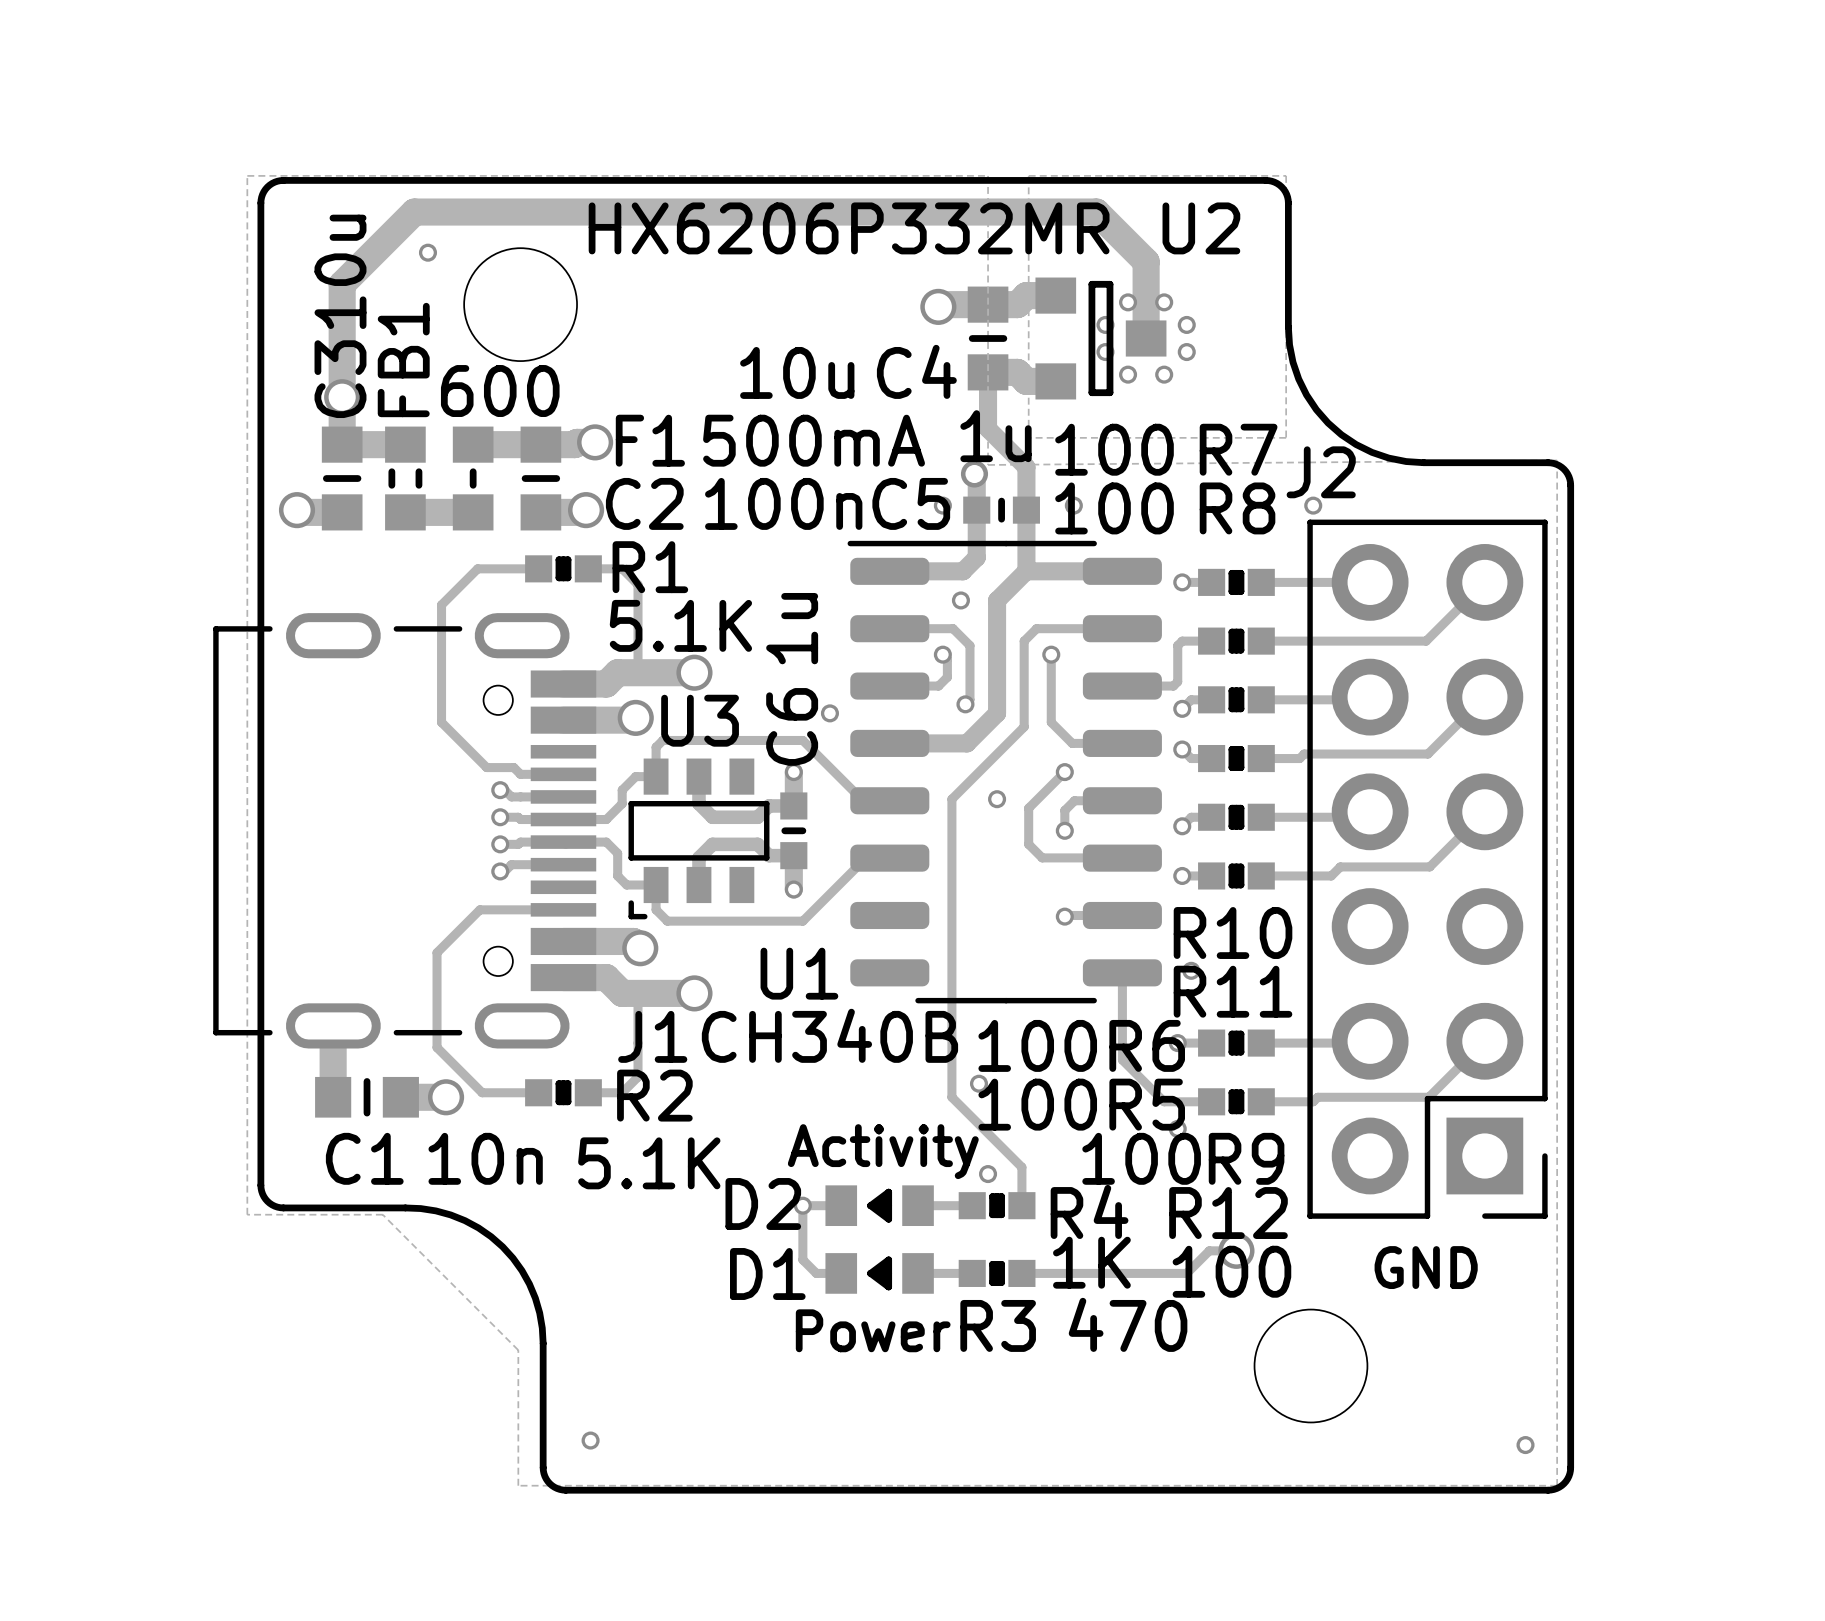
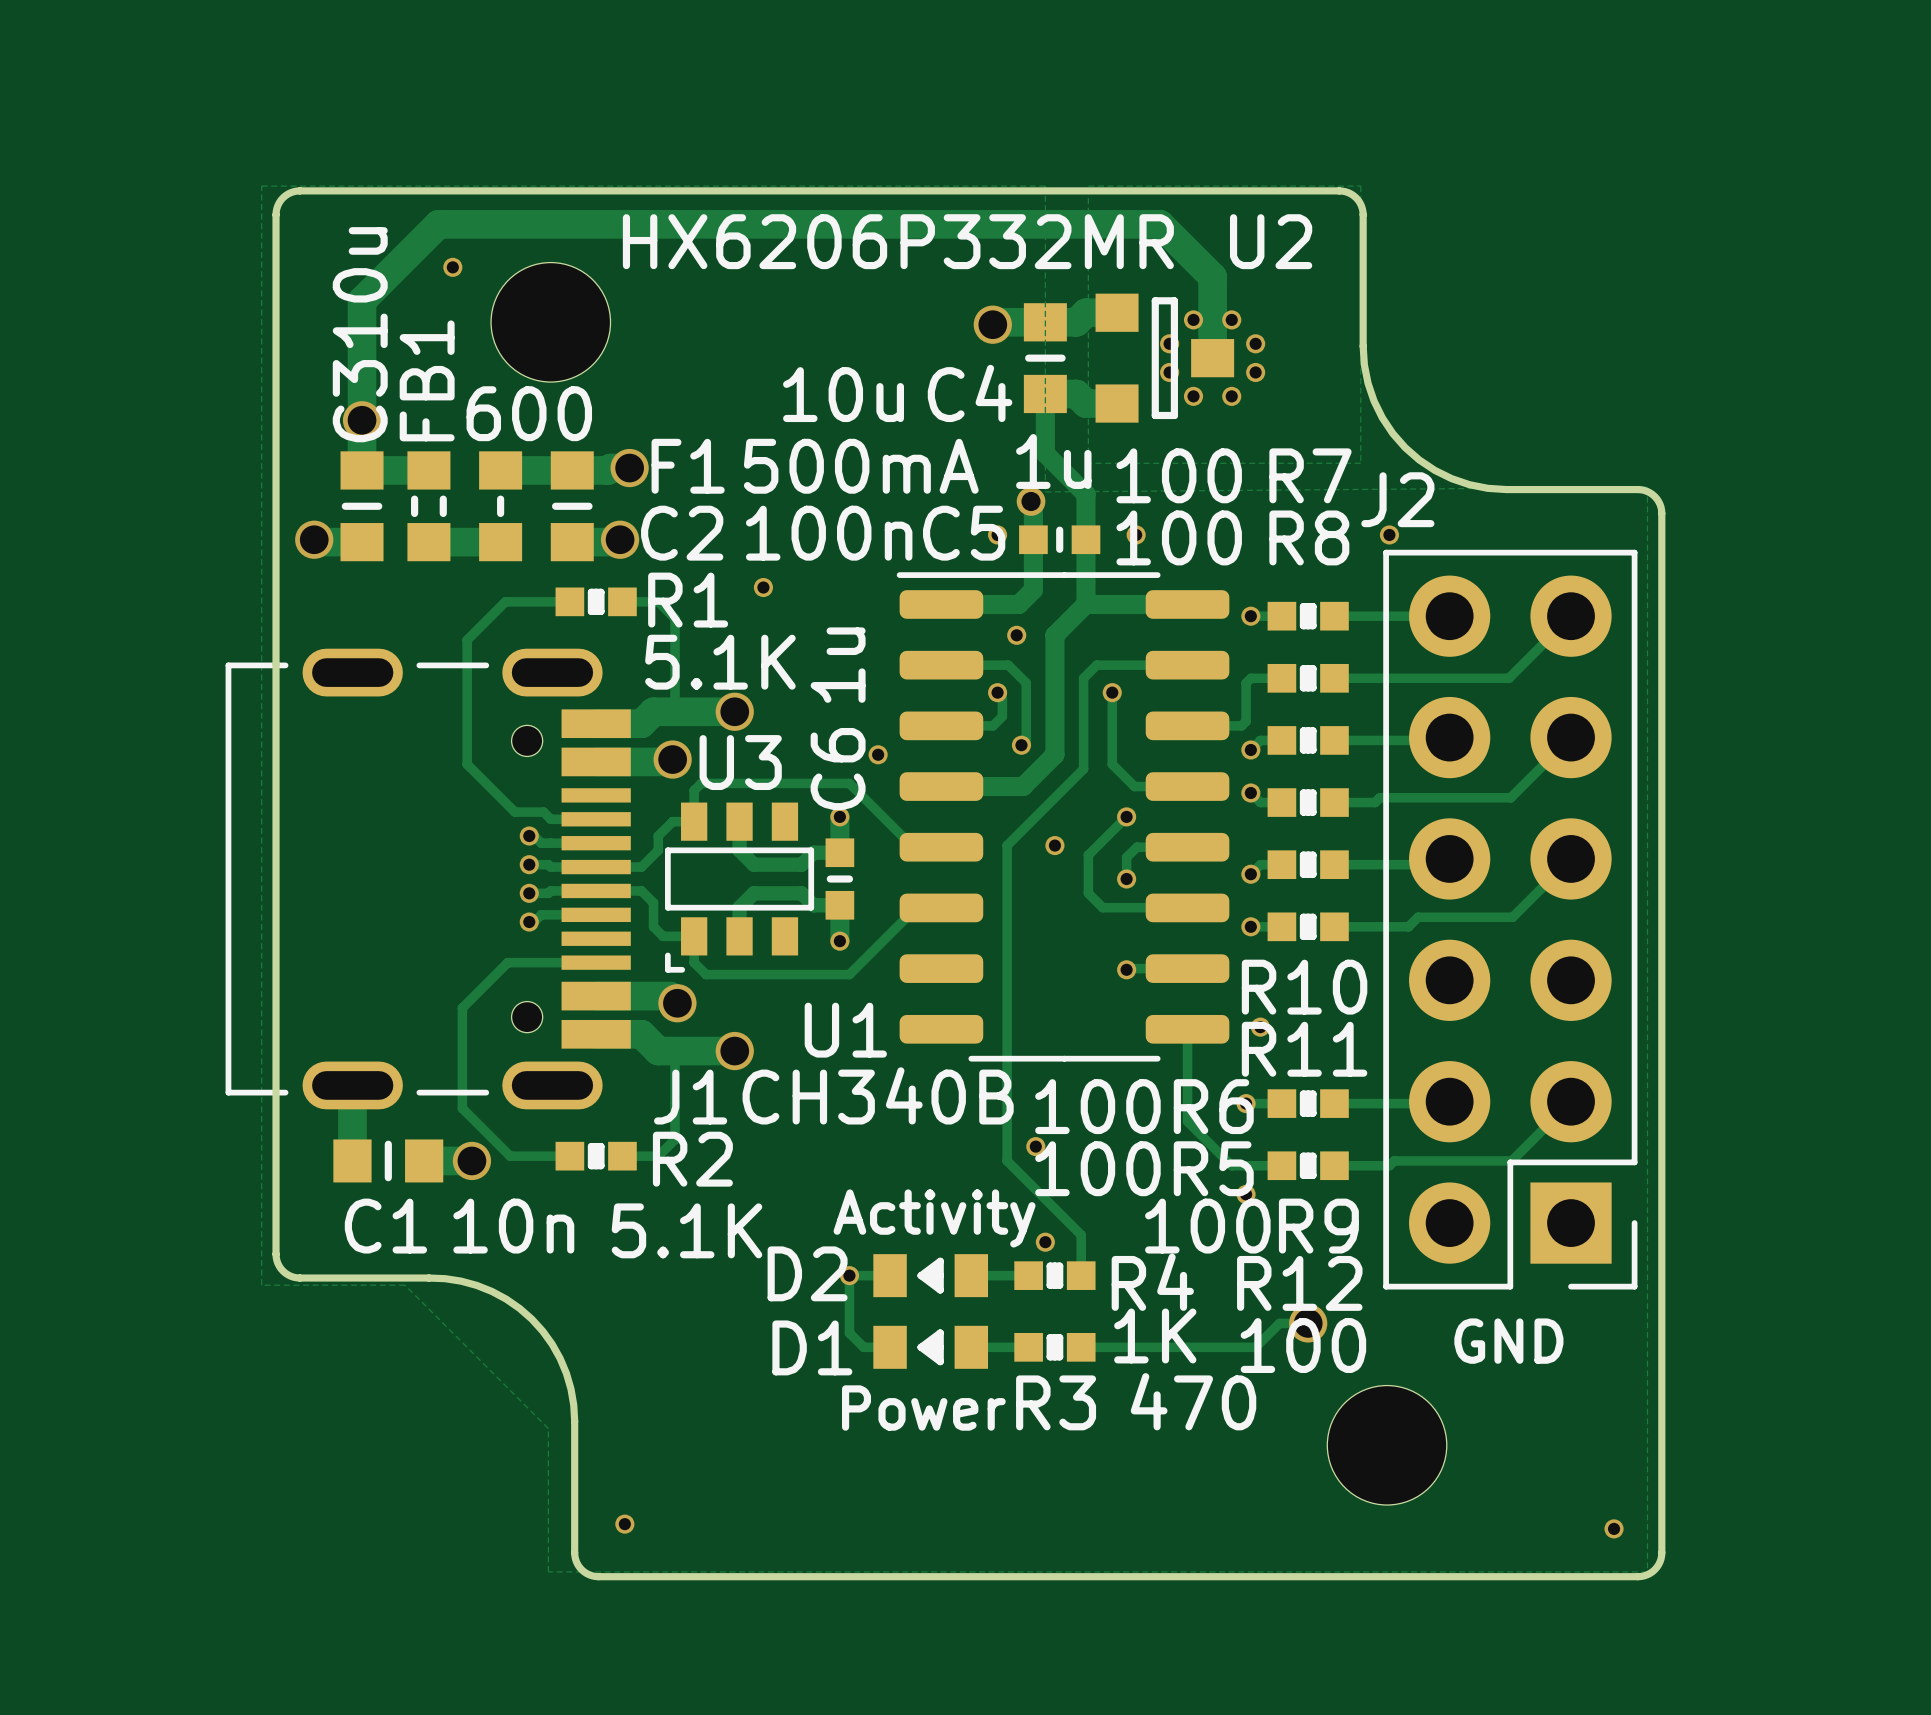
via: none -> (763, 587)

